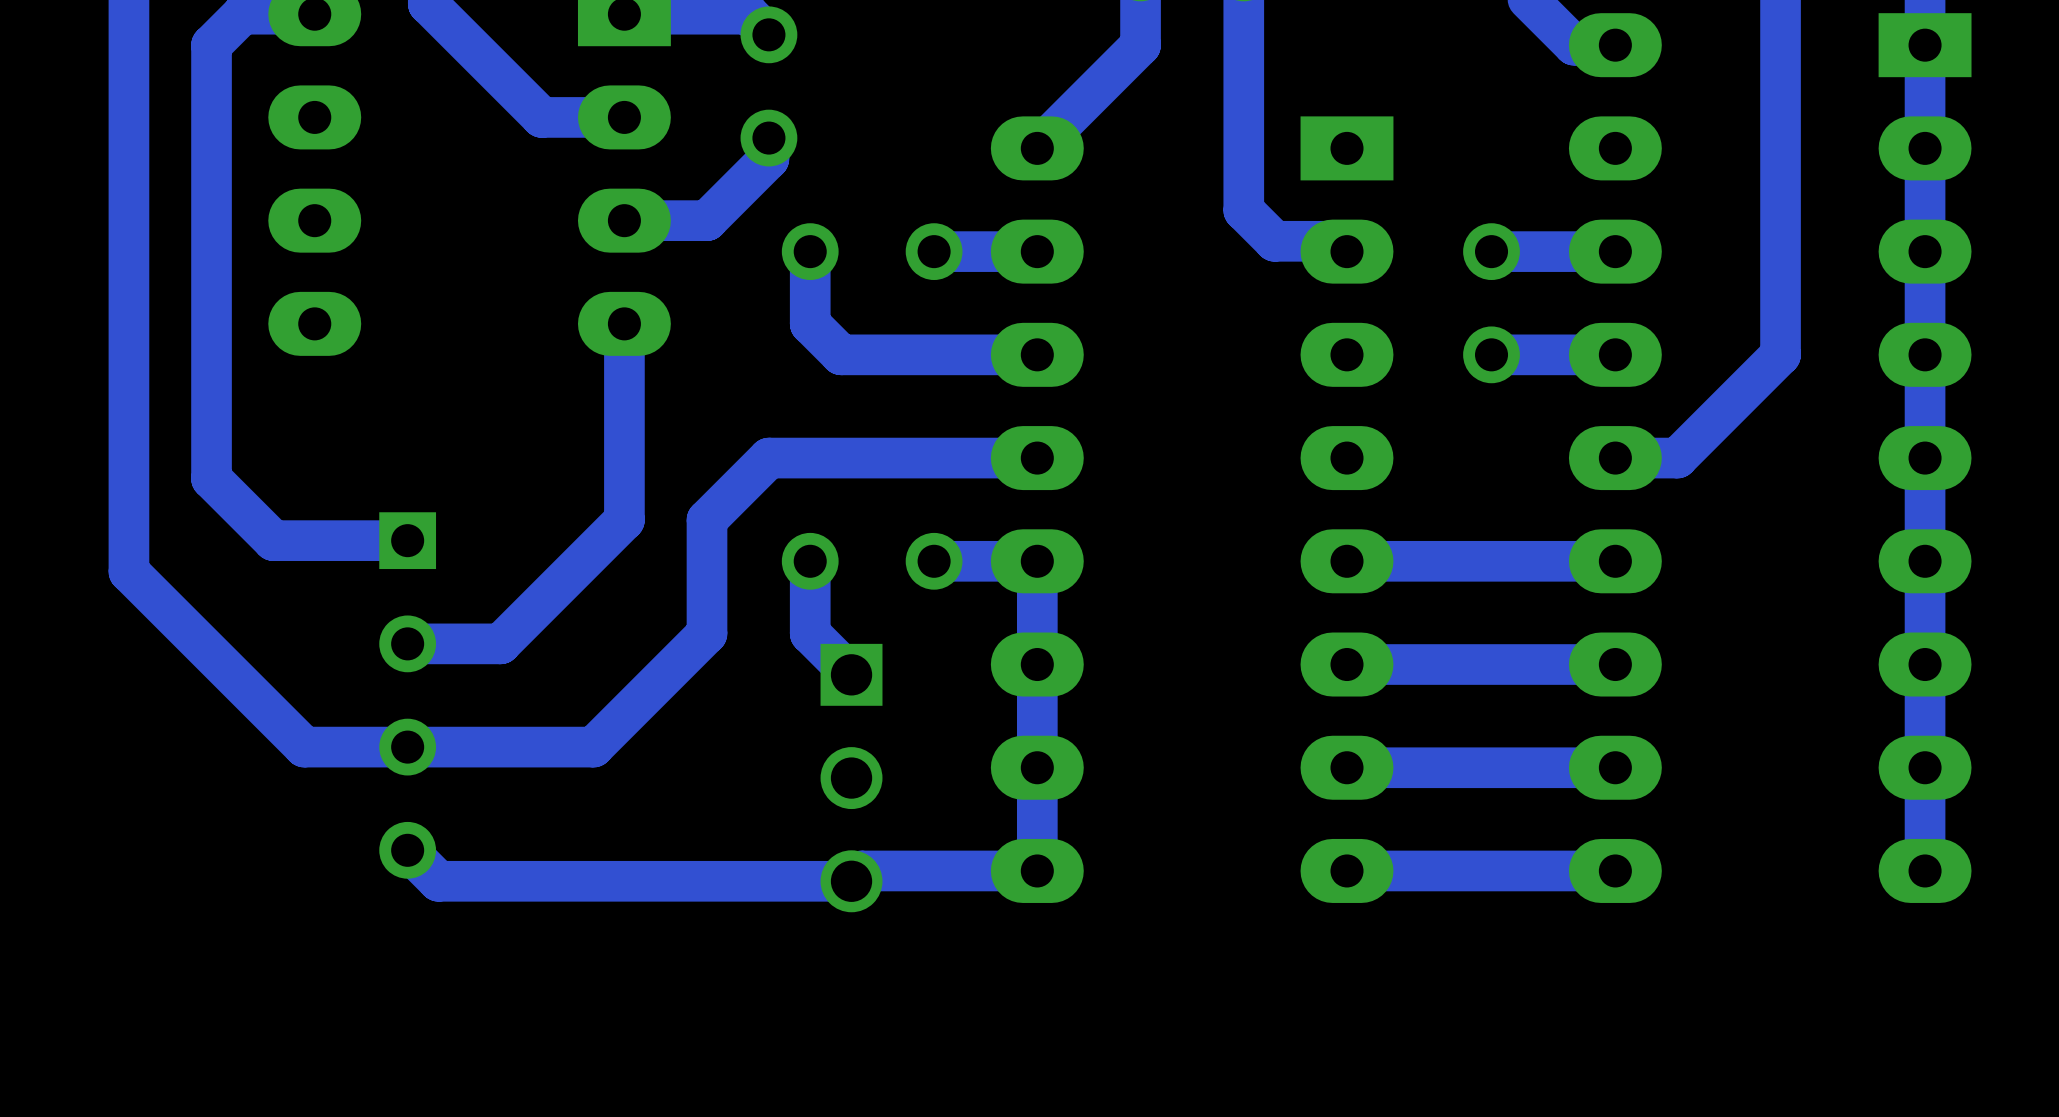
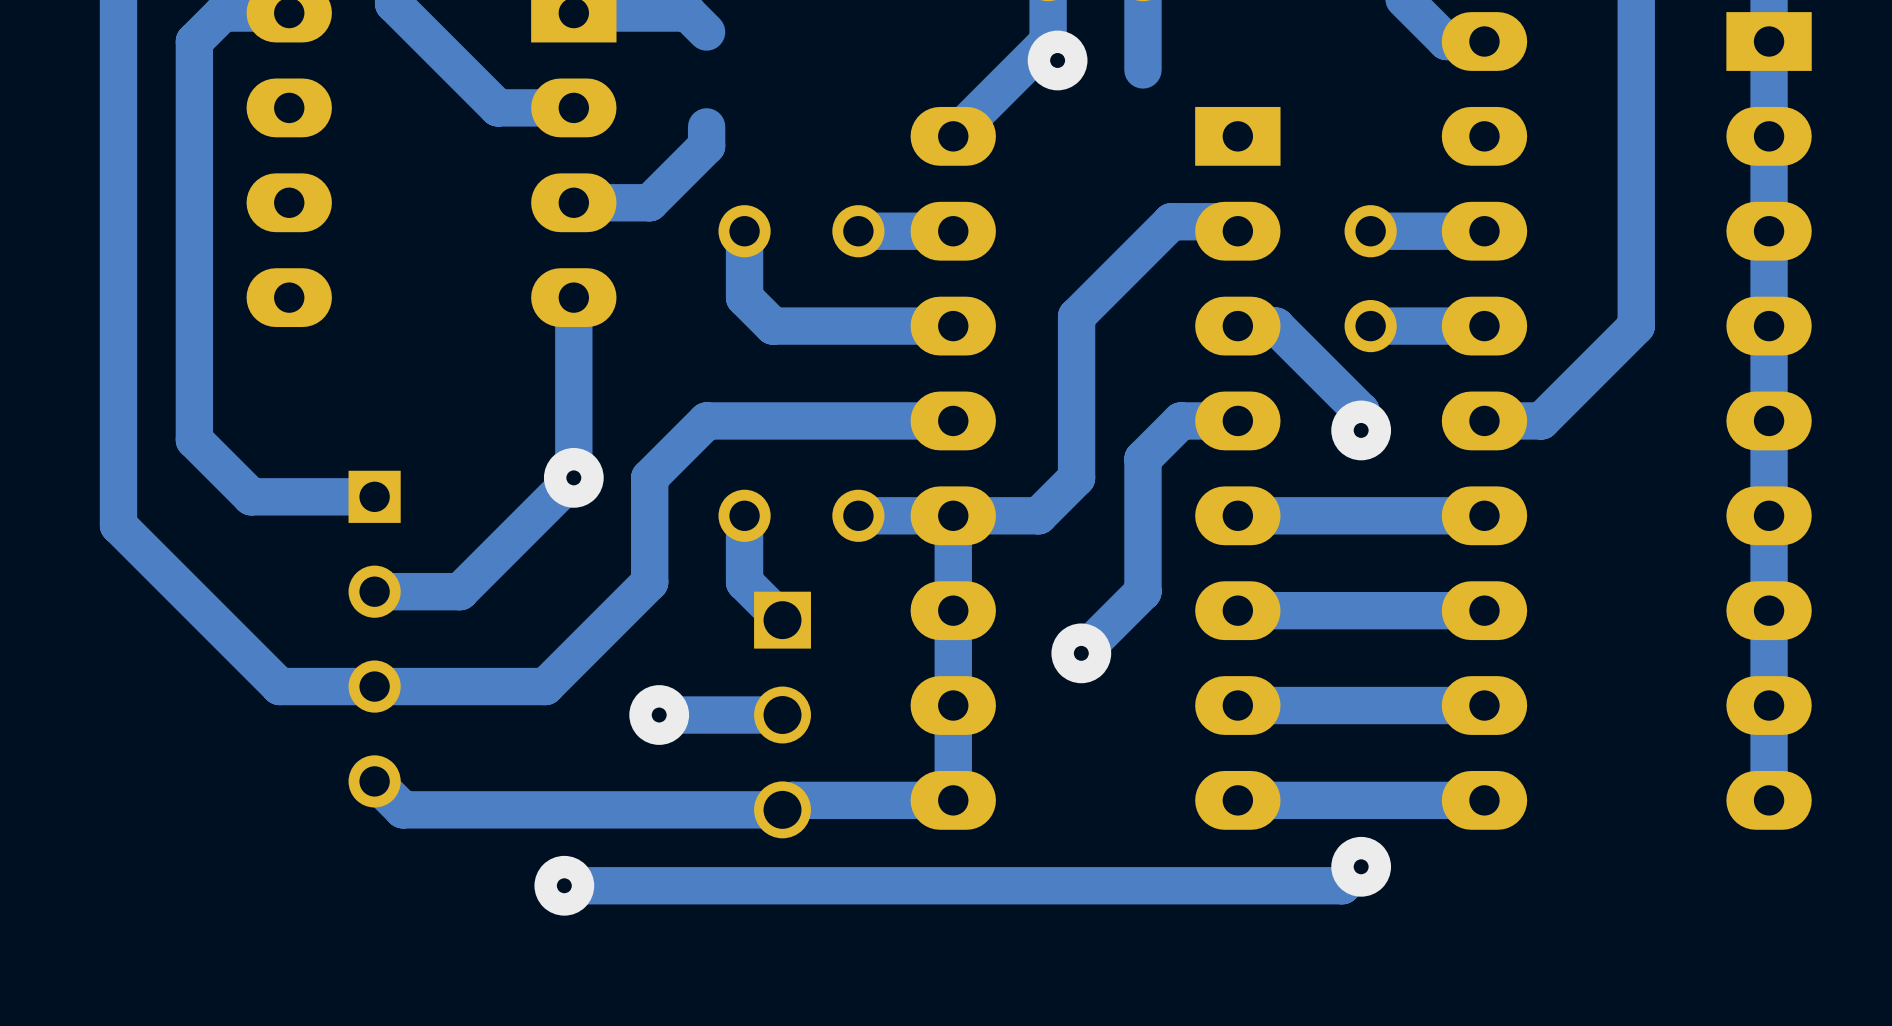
via: none -> (1057, 60)
track: (1243, 76) (1243, 210) (1274, 241) -> (953, 515) (1038, 515) (1076, 477) (1076, 316) (1171, 221)
part: (768, 86) -> none
track: none -> (1237, 326) (1275, 326) (1361, 411) (1361, 430)
track: none -> (1237, 420) (1180, 420) (1142, 458) (1142, 591) (1076, 658)
via: none -> (1361, 430)
via: none -> (573, 477)
via: none -> (1081, 653)
via: none -> (659, 715)
track: none -> (782, 715) (659, 715)
track: none -> (1361, 866) (1342, 885) (564, 885)
via: none -> (1361, 866)
via: none -> (564, 885)

